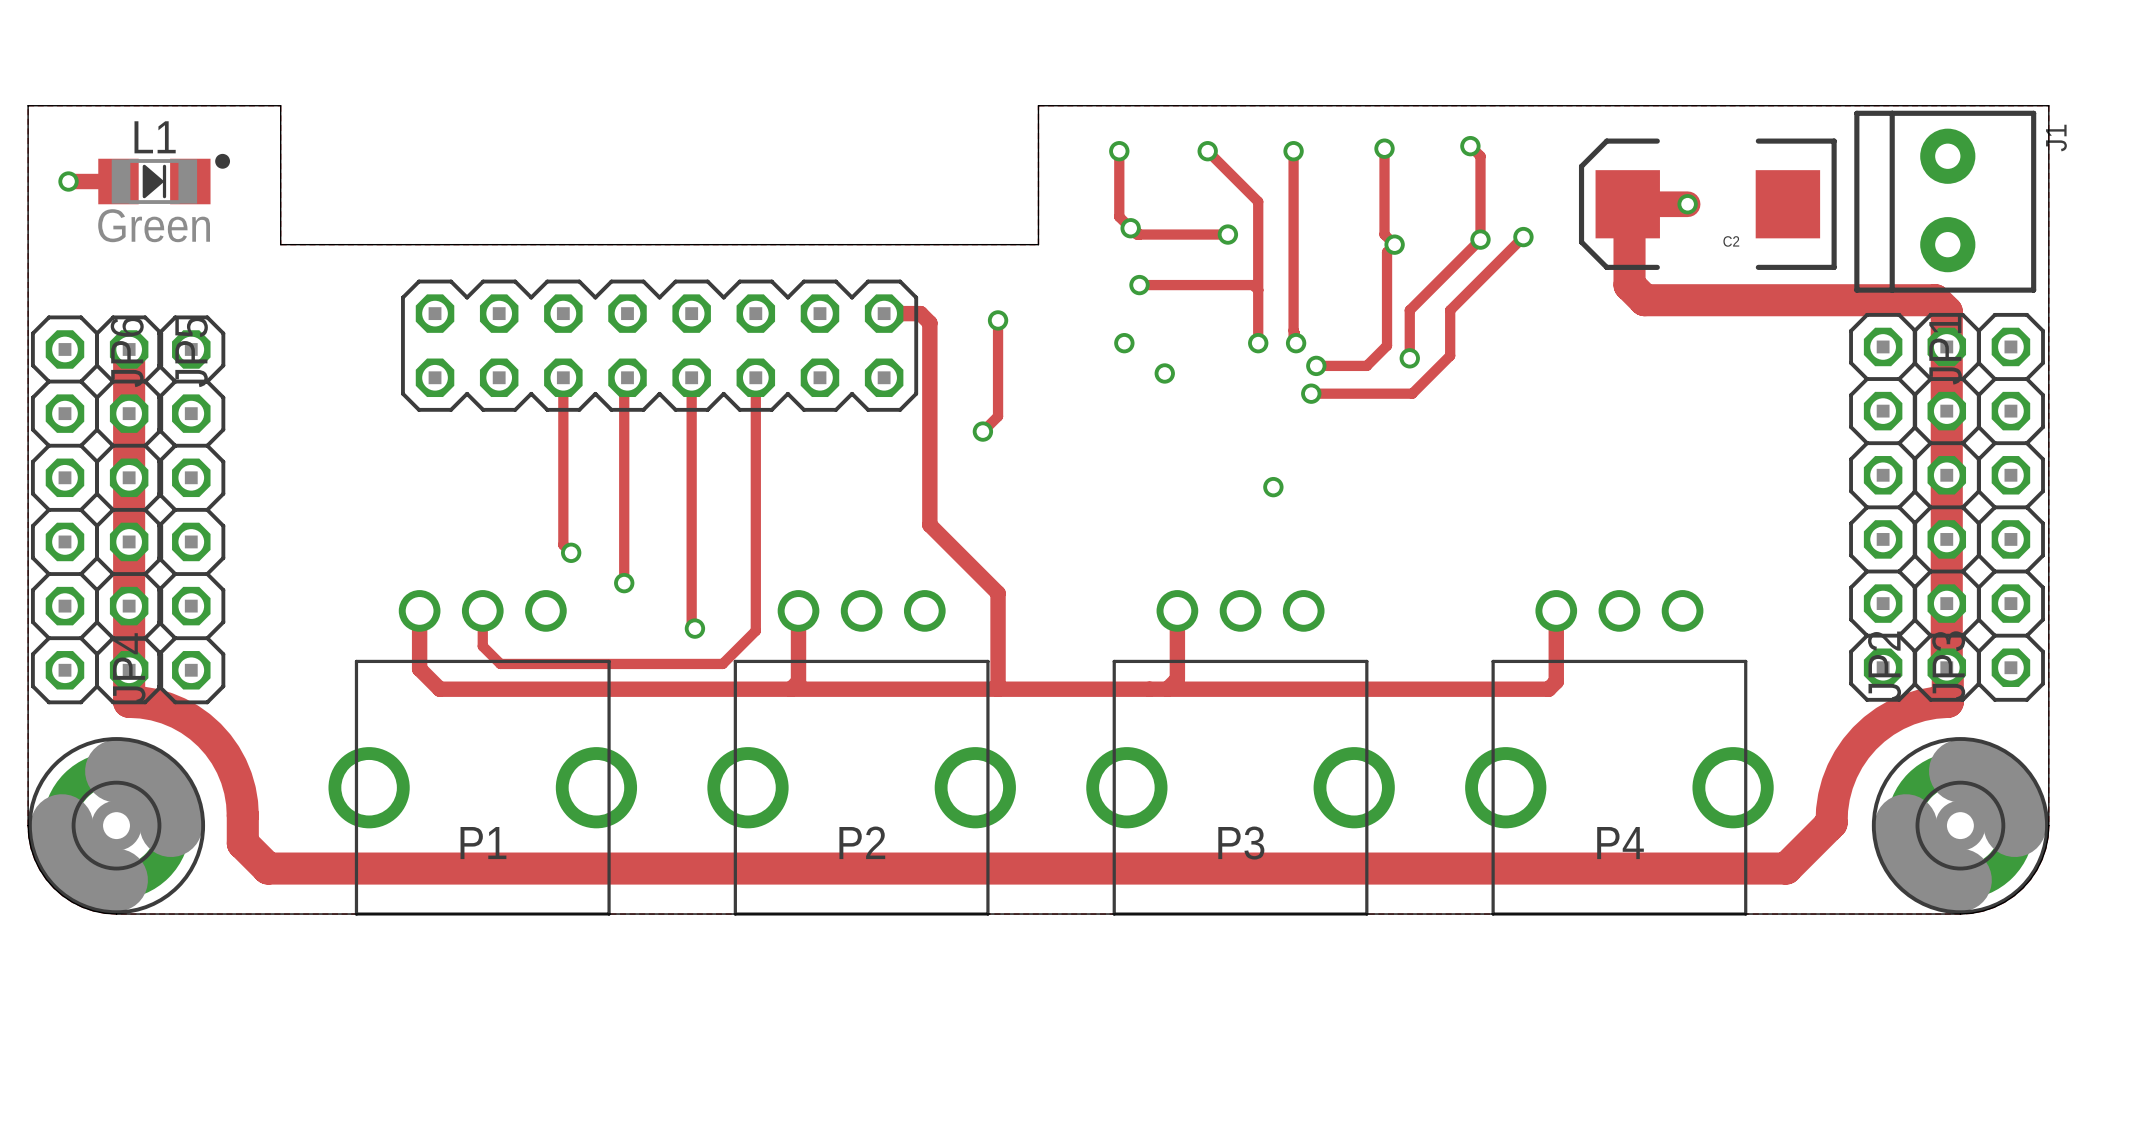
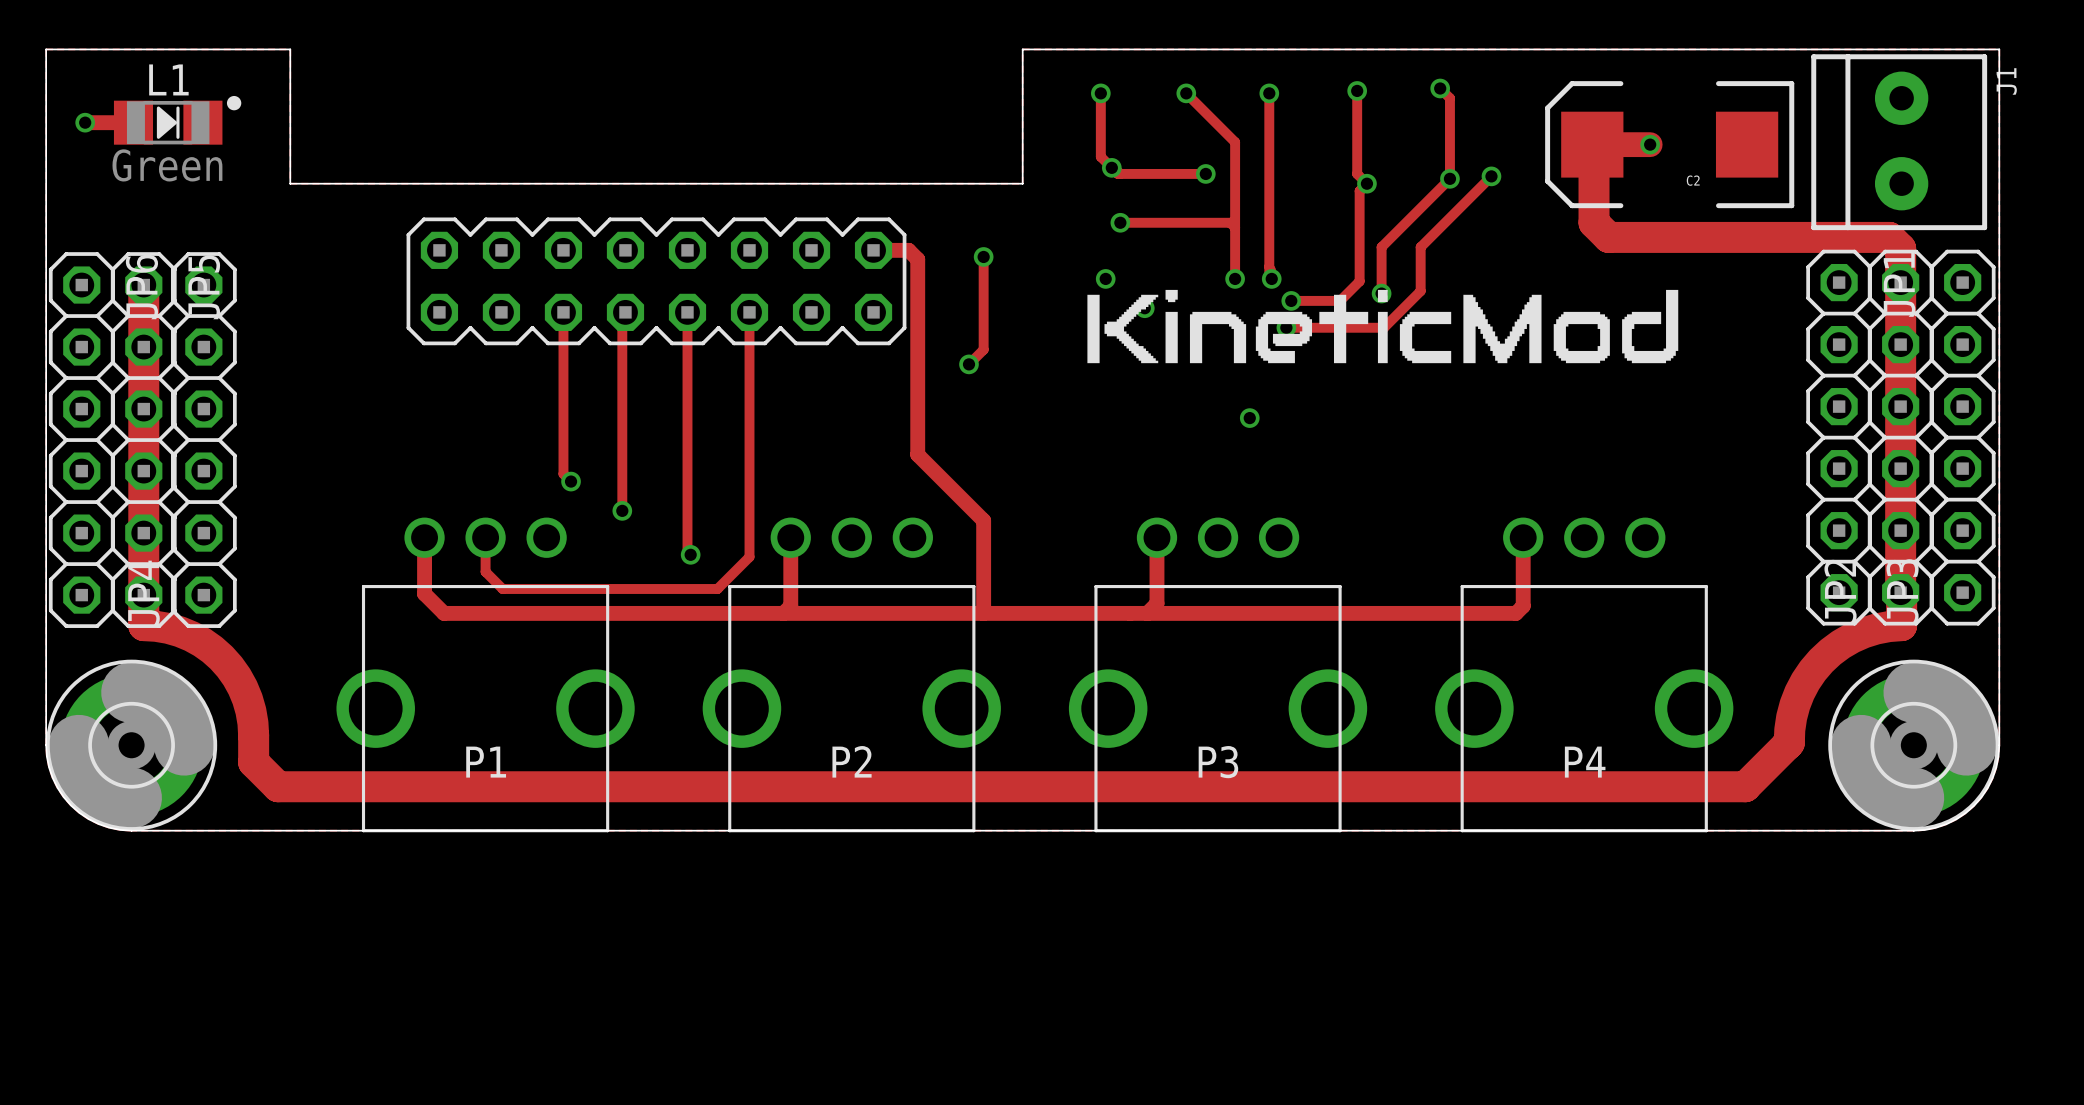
drawing: none -> [1087, 289, 1679, 364]

